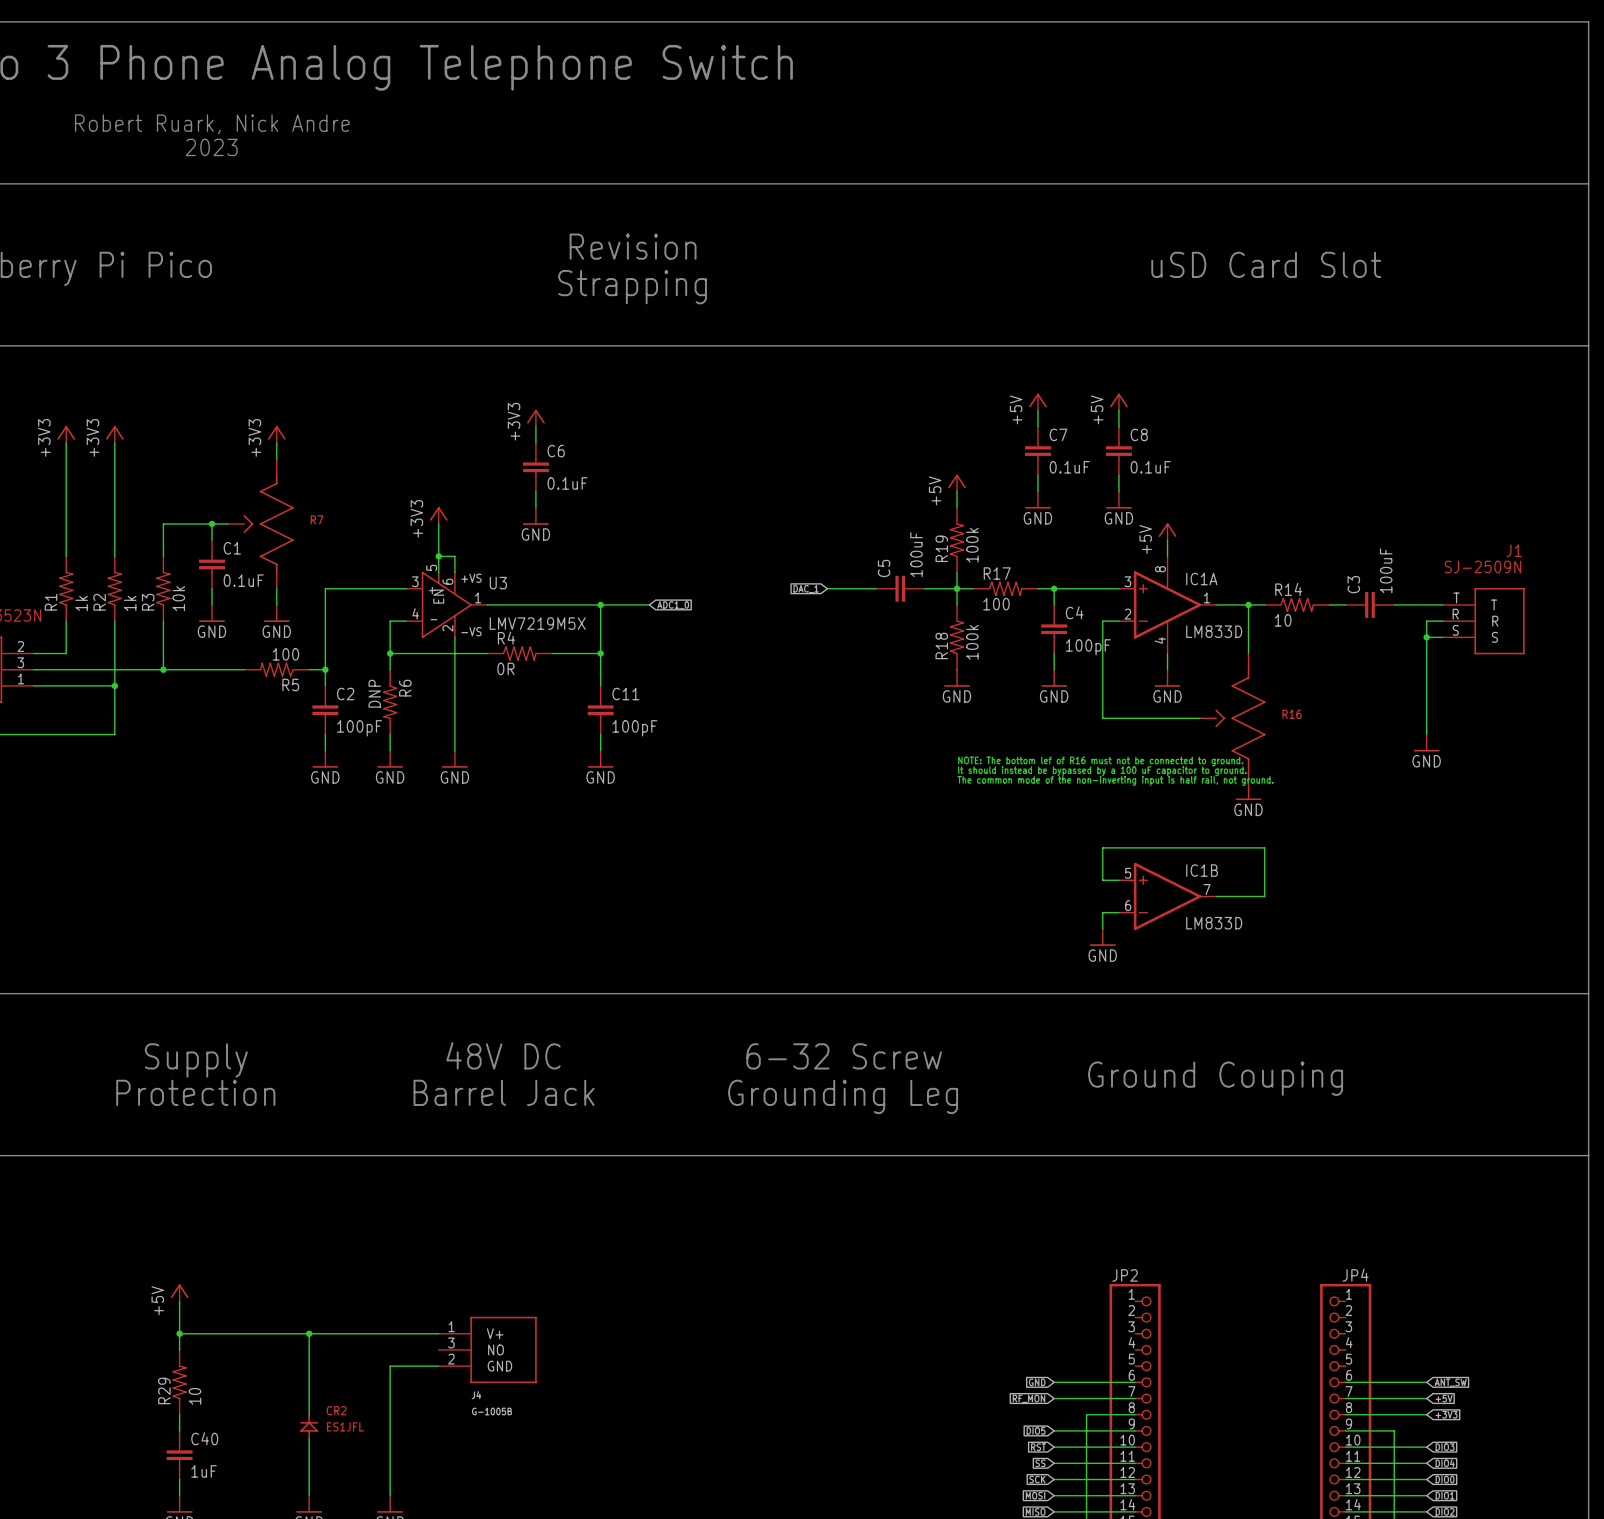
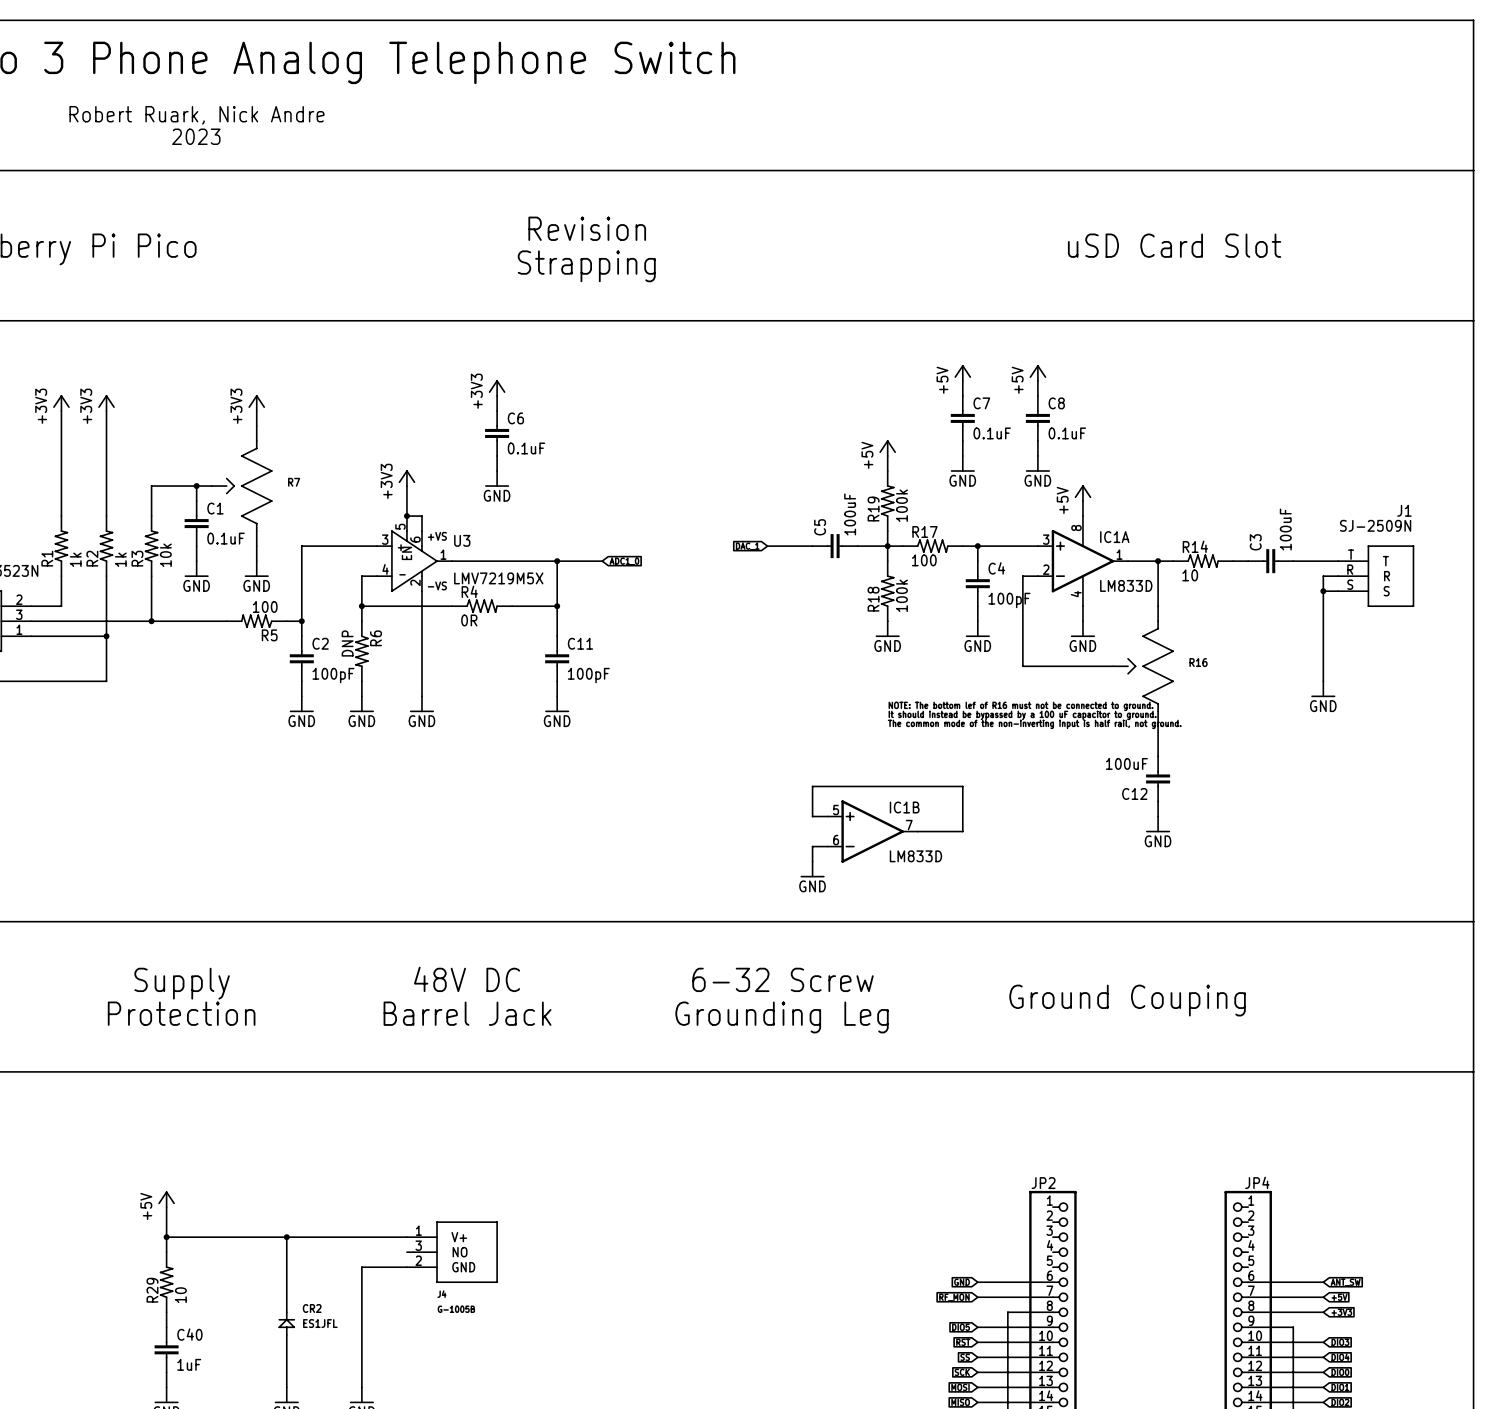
power symbol: GND (1248, 791) -> none
C12: none -> 100uF (1158, 778)
wire: none -> (1158, 801) (1158, 816)
wire: none -> (827, 816) (812, 816) (812, 786) (962, 786) (962, 831) (917, 831)
wire: (1118, 880) (1102, 880) (1102, 847) (1264, 847) (1264, 896) (1216, 896) -> none
power symbol: none -> GND (1158, 824)
IC1B position: (1167, 896) -> (872, 831)
wire: none -> (827, 846) (812, 846) (812, 861)
wire: (1118, 912) (1102, 912) (1102, 928) -> none
power symbol: none -> GND (812, 869)
power symbol: GND (1102, 937) -> none

